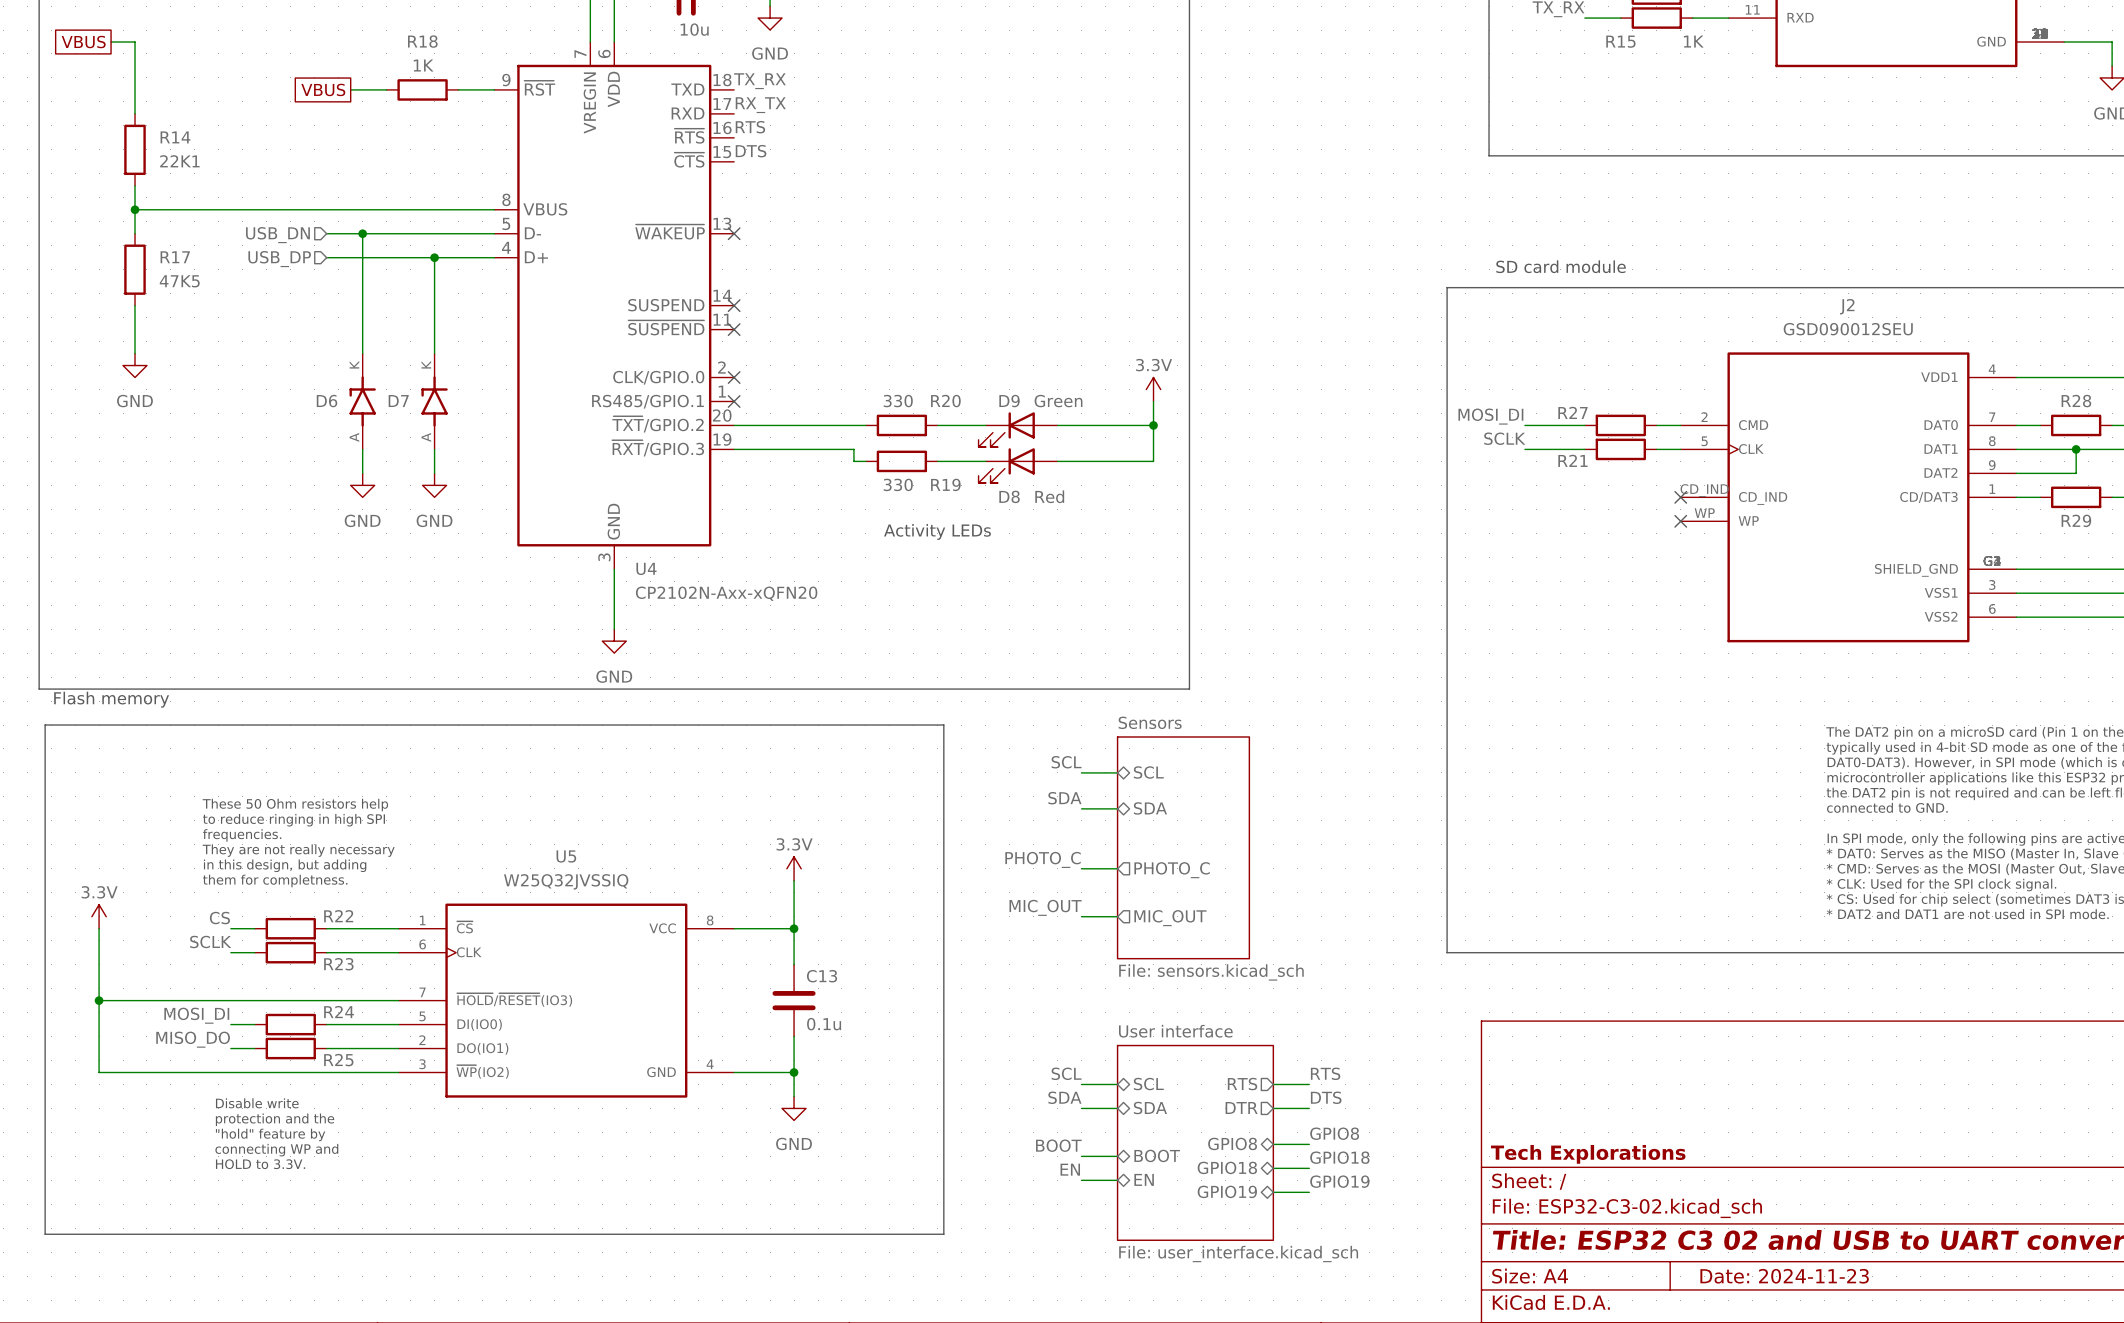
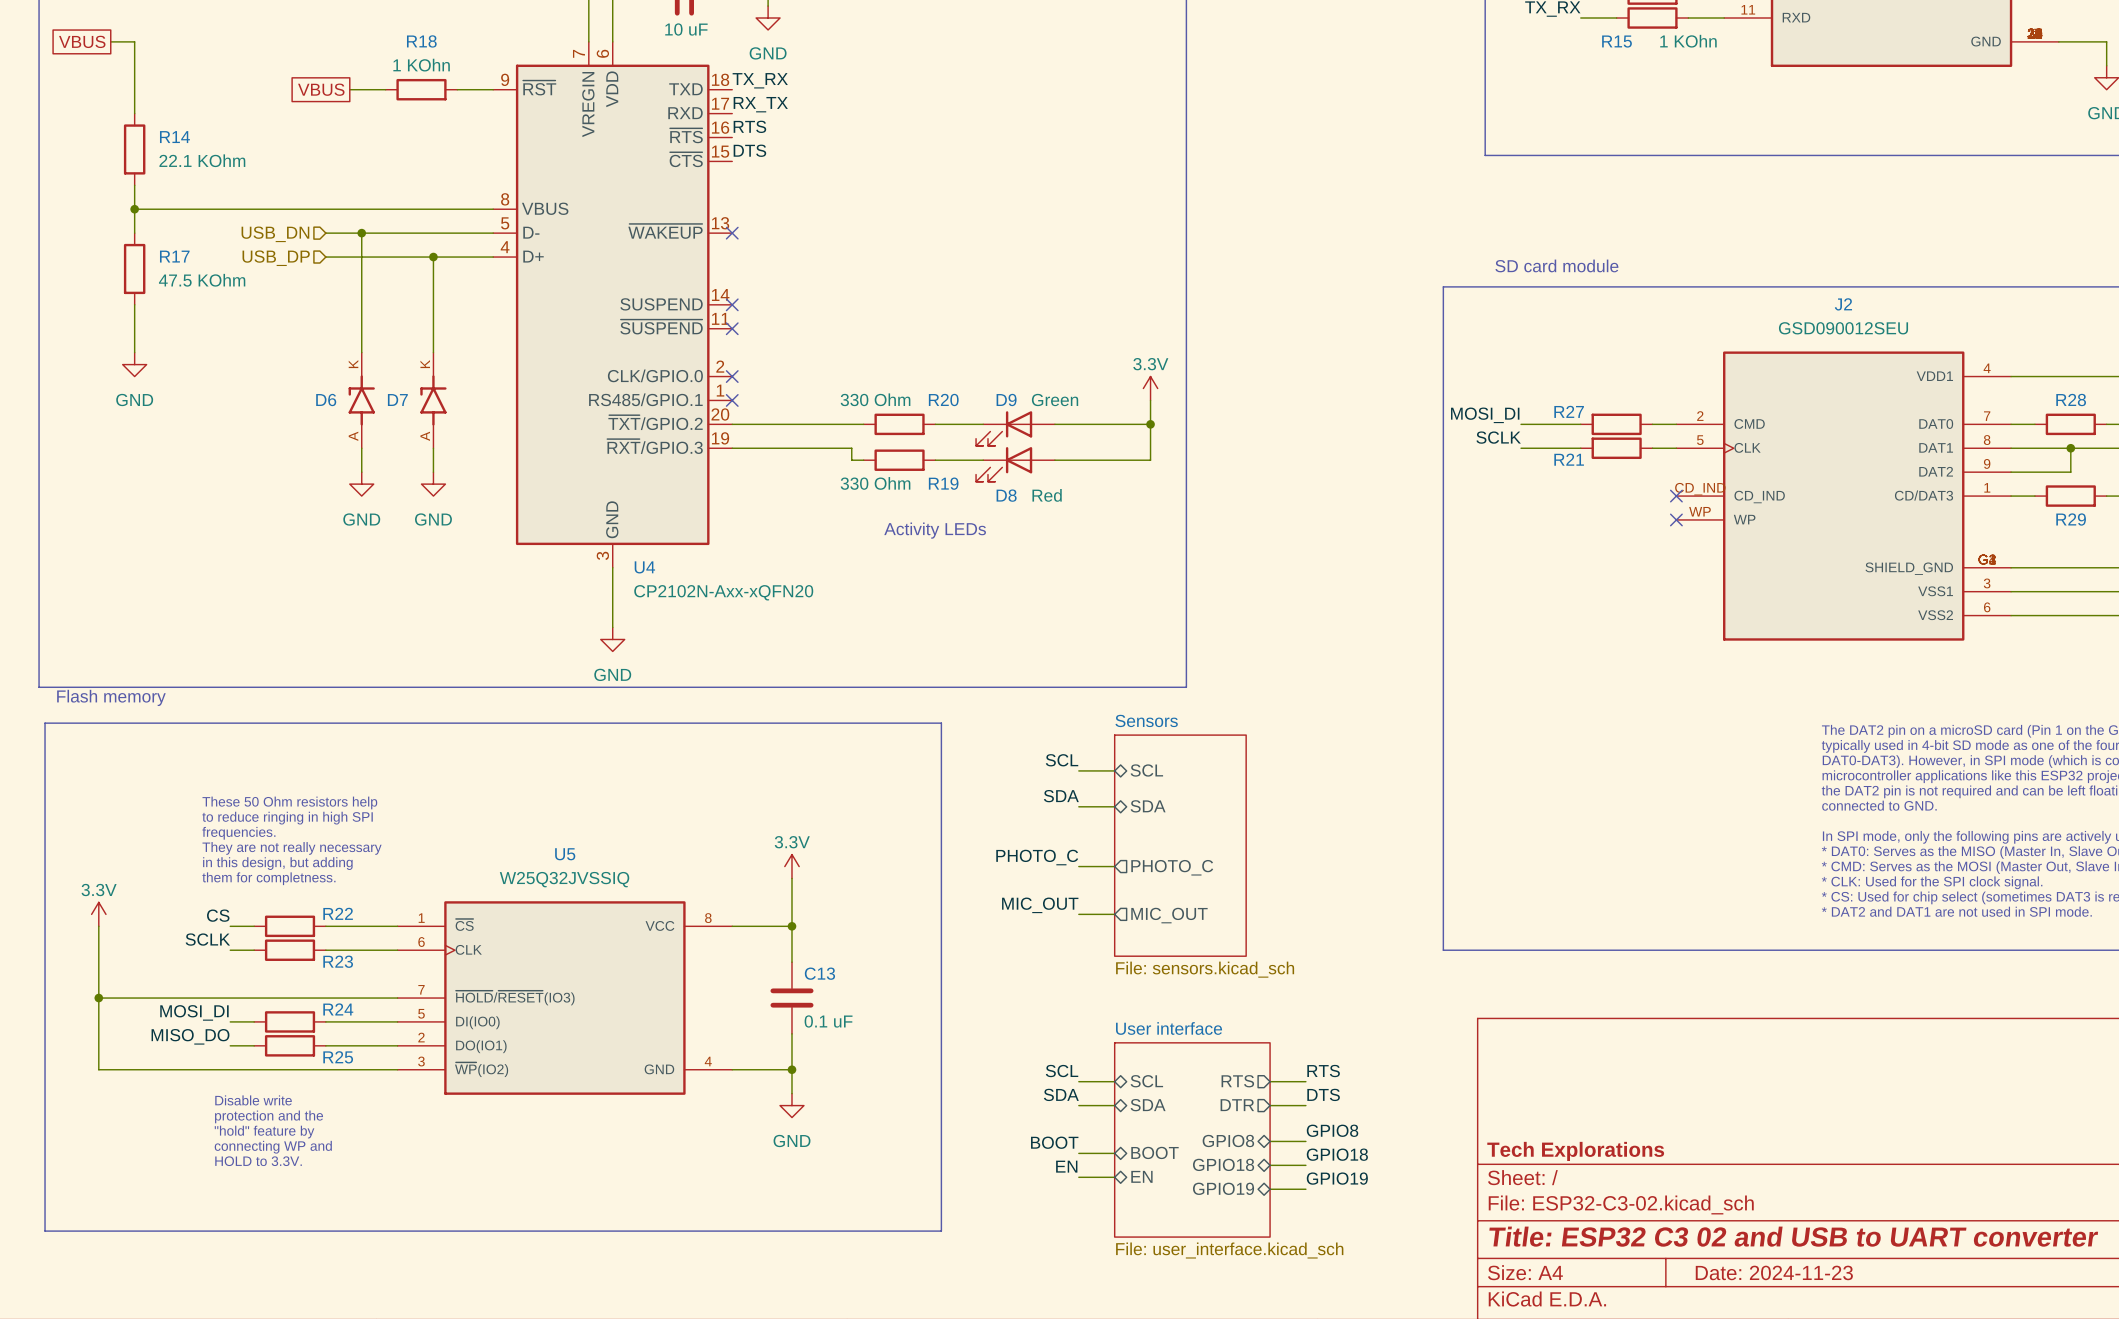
part value: 10u (694, 29) -> 10 uF (686, 29)
R15 value: 1K (1693, 41) -> 1 KOhn (1688, 41)
R18 value: 1K (423, 65) -> 1 KOhn (421, 65)
R14 value: 22K1 (179, 161) -> 22.1 KOhm (202, 160)
R17 value: 47K5 (179, 281) -> 47.5 KOhm (202, 280)
R20 value: 330 (898, 401) -> 330 Ohm (875, 399)
R19 value: 330 (898, 484) -> 330 Ohm (875, 483)
C13 value: 0.1u (824, 1024) -> 0.1 uF (828, 1021)

